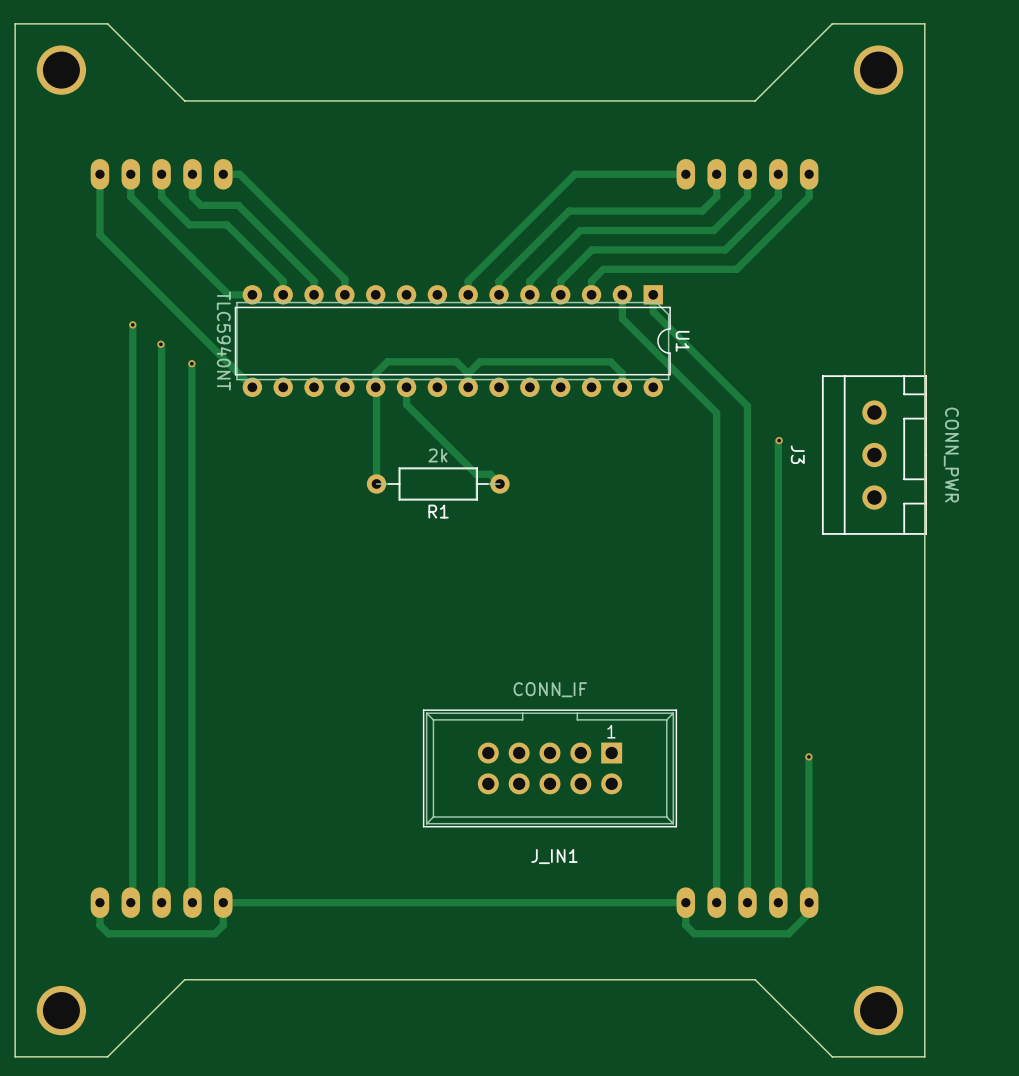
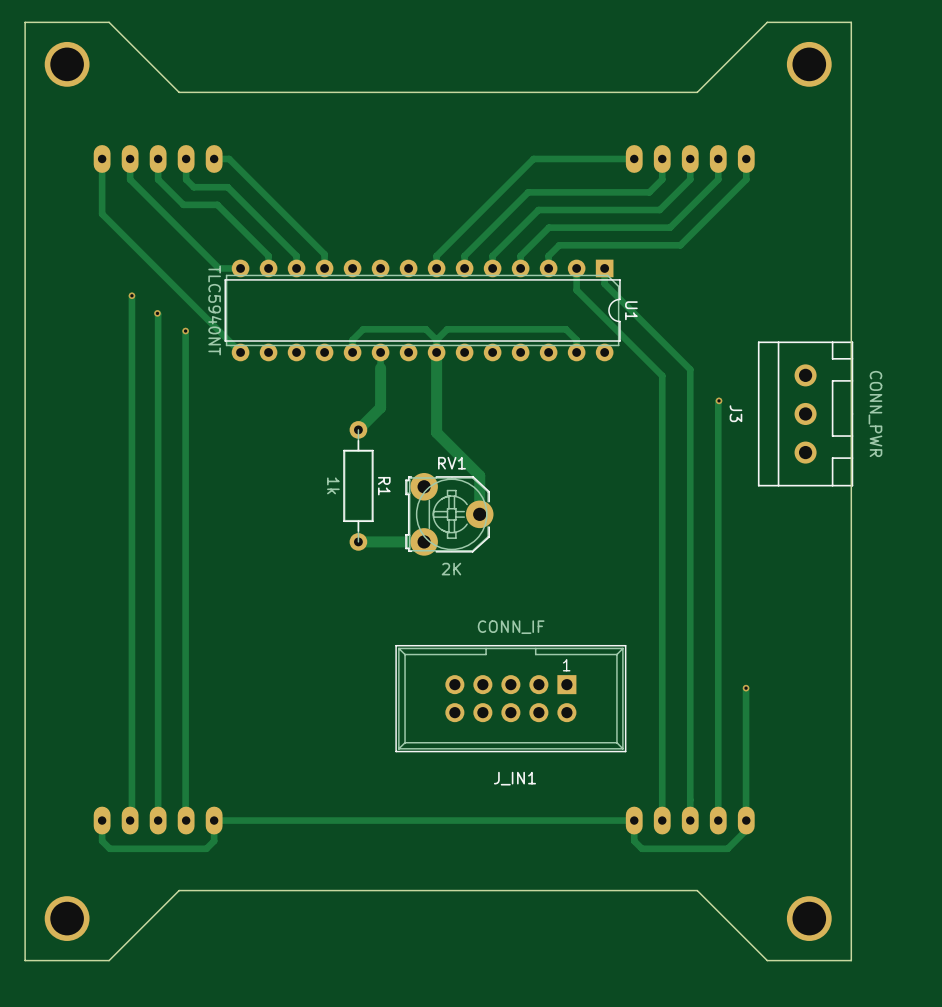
track: none -> (436, 352) (436, 432) (479, 475) (479, 514)
track: (376, 388) (376, 483) -> none
track: (406, 404) (476, 474) (490, 474) (499, 483) -> (380, 368) (380, 407) (358, 429)
R1 value: 2k (437, 455) -> 1k (333, 485)
R1 rotation: 0° (438, 483) -> 90° clockwise (358, 485)
R1 name position: R1 (438, 511) -> R1 (384, 486)
RV1: none -> 2K (449, 514)
track: none -> (424, 541) (358, 541)

